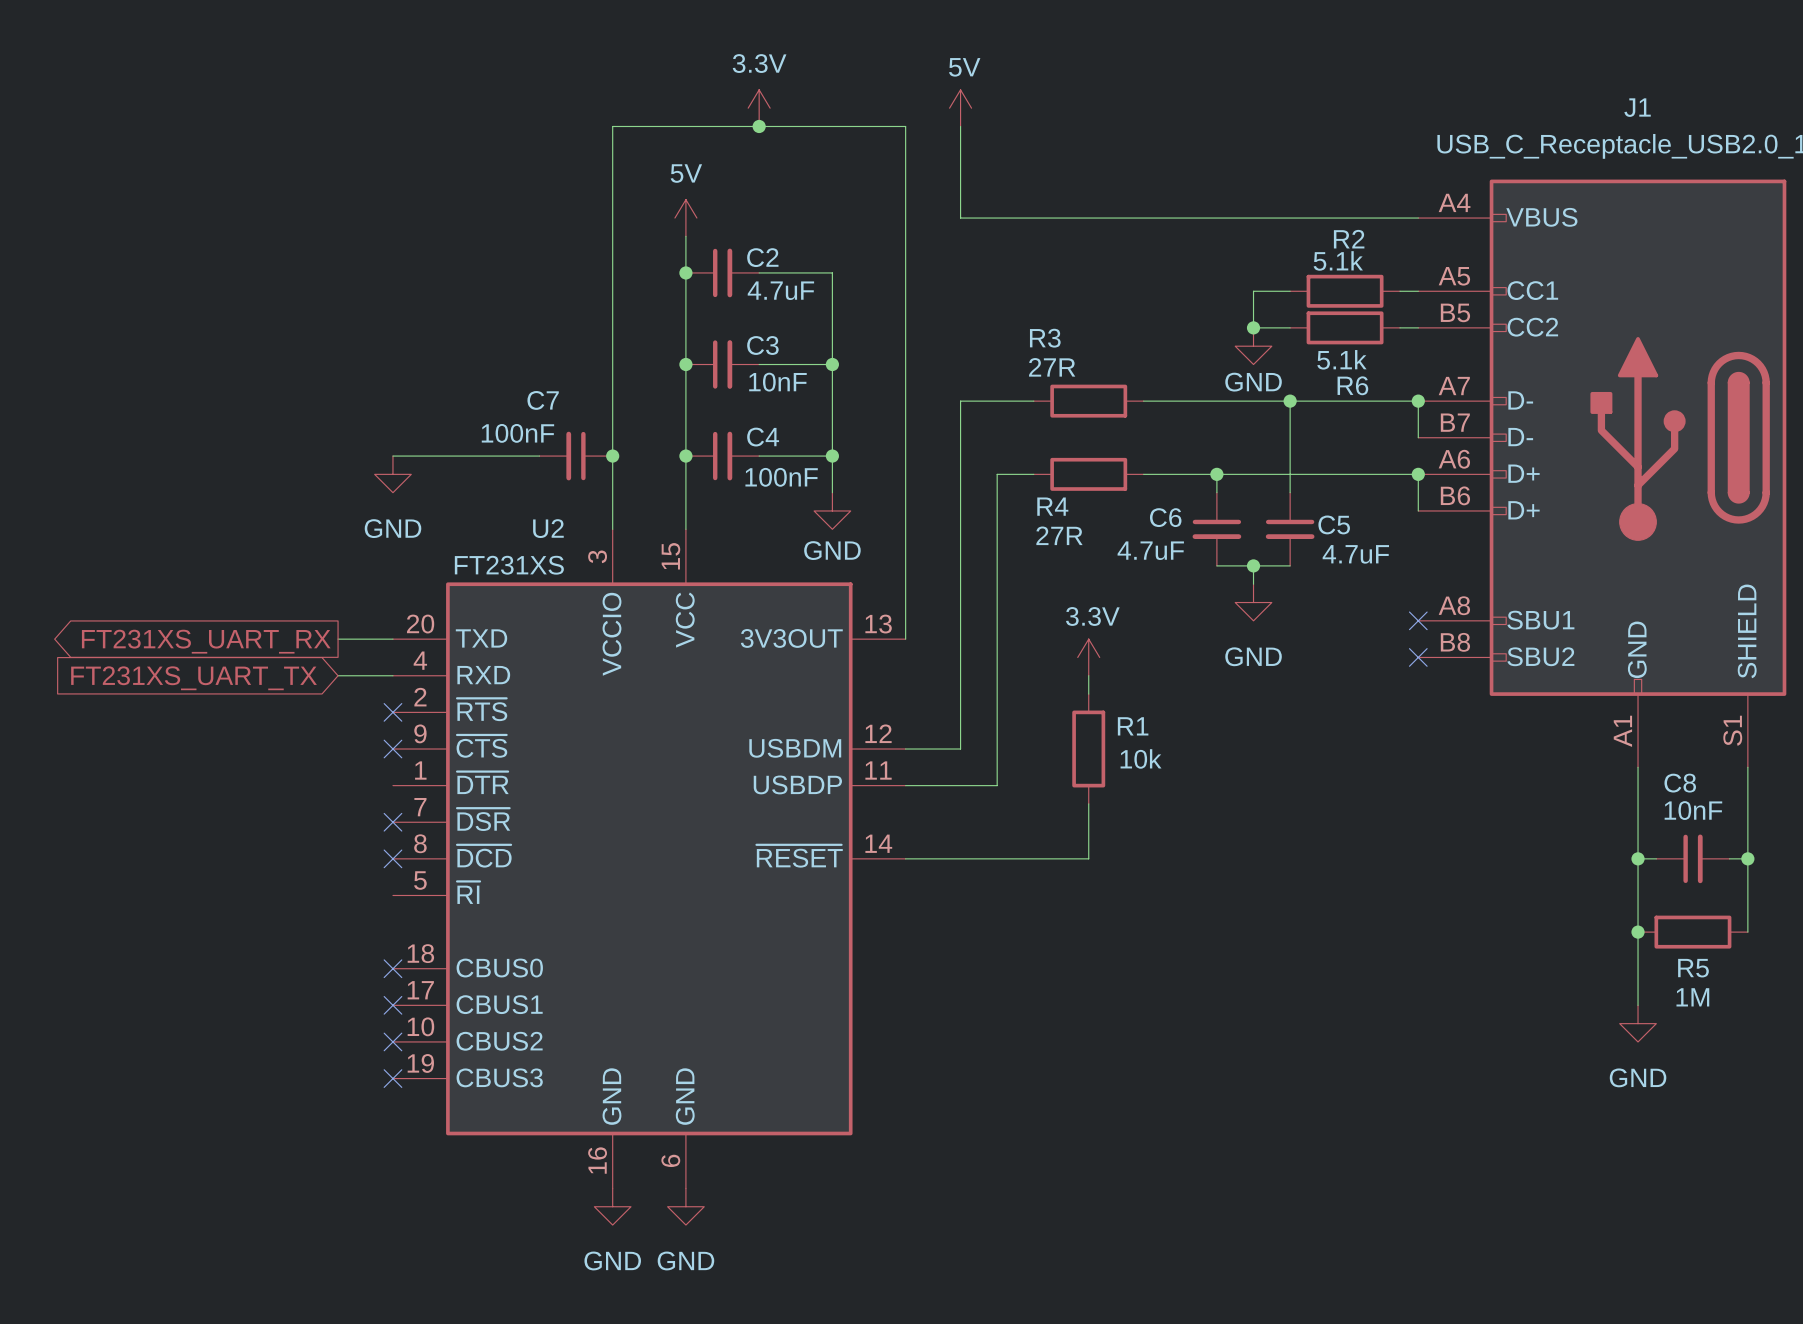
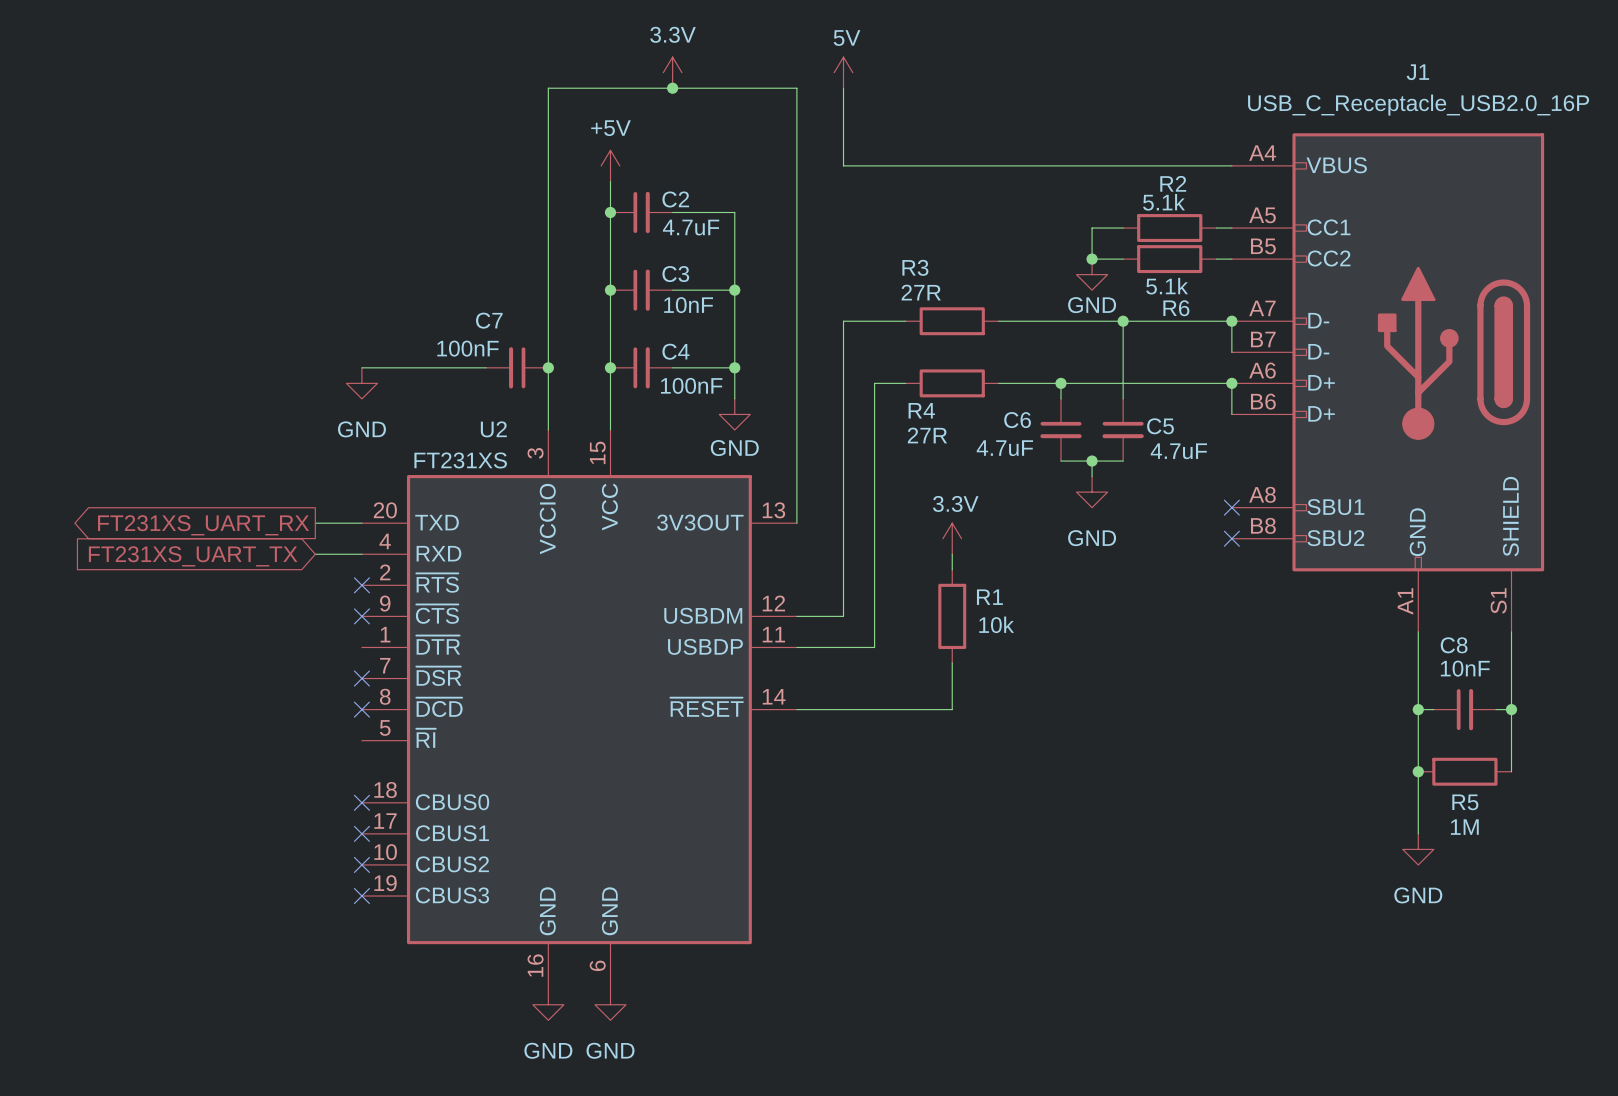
power symbol: 5V (685, 218) -> +5V (610, 165)

